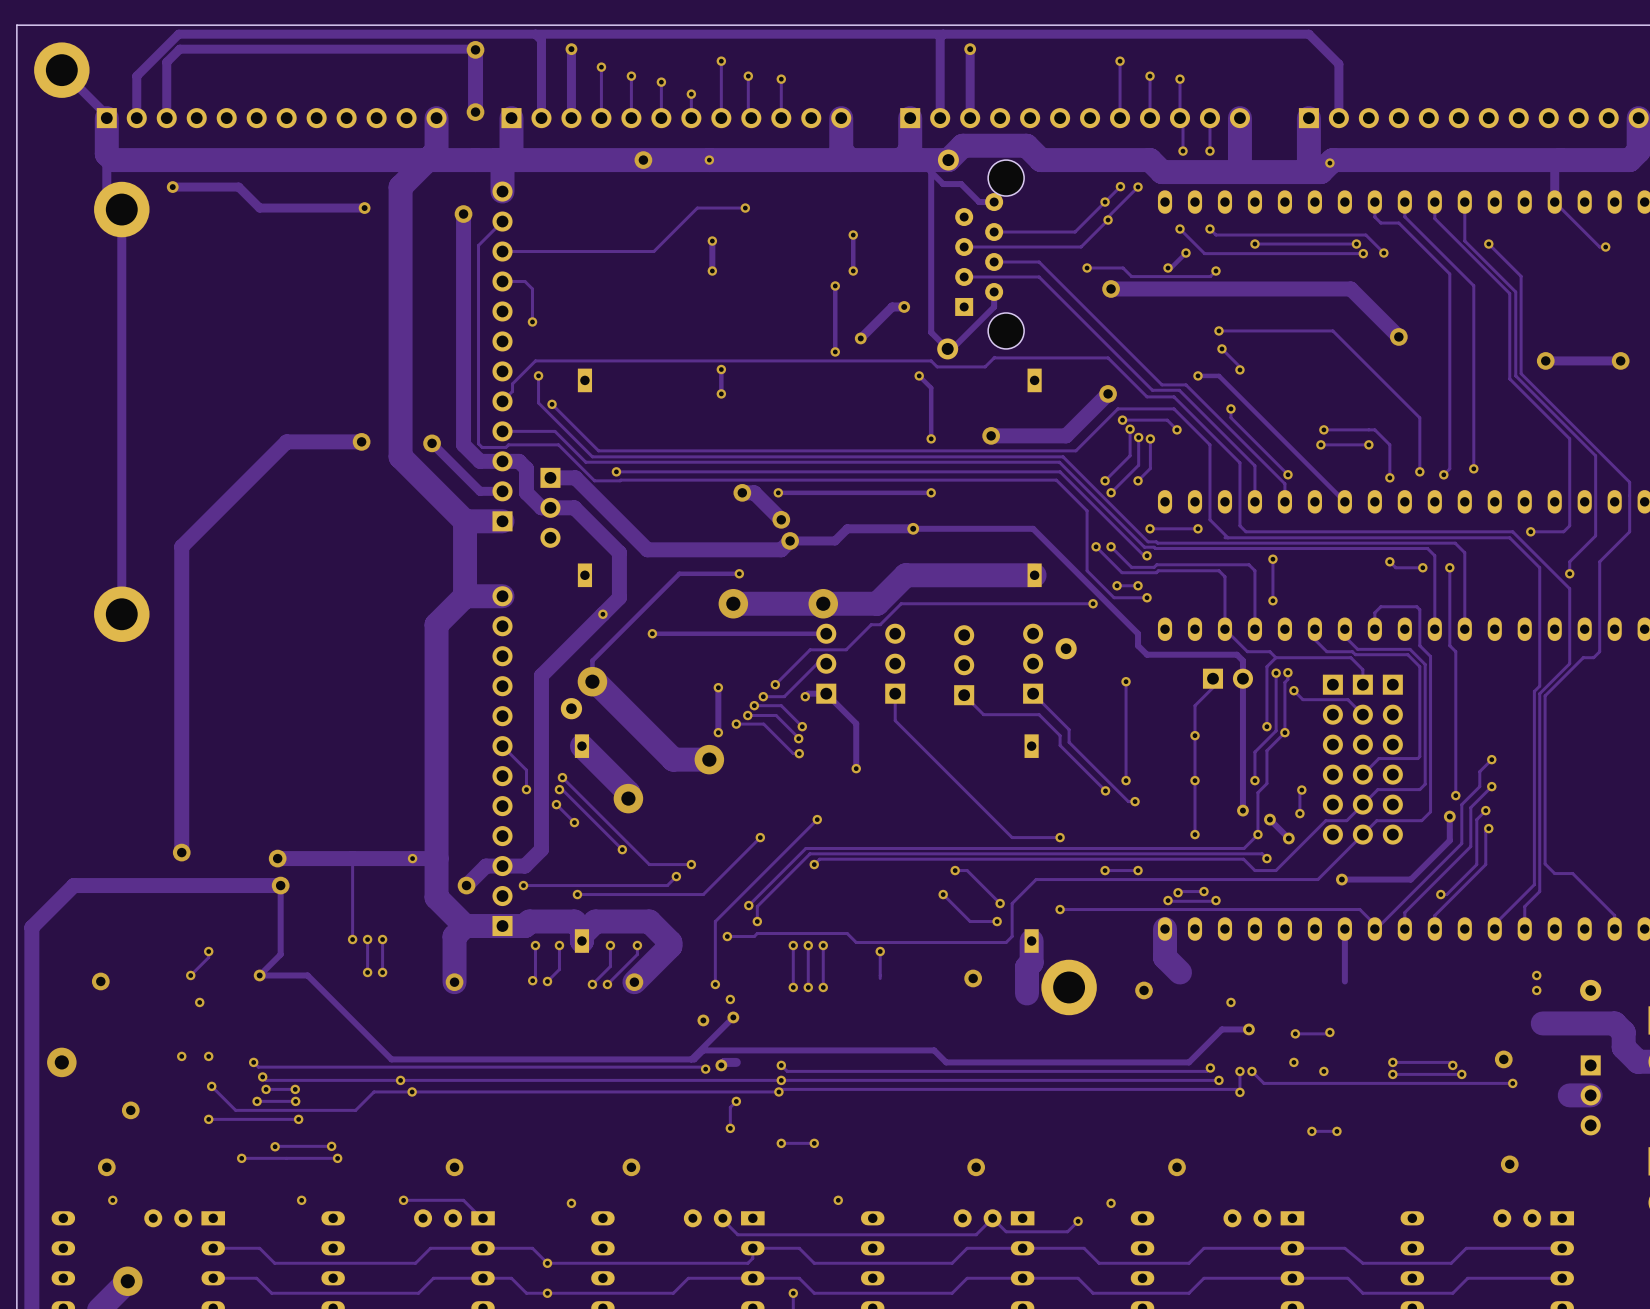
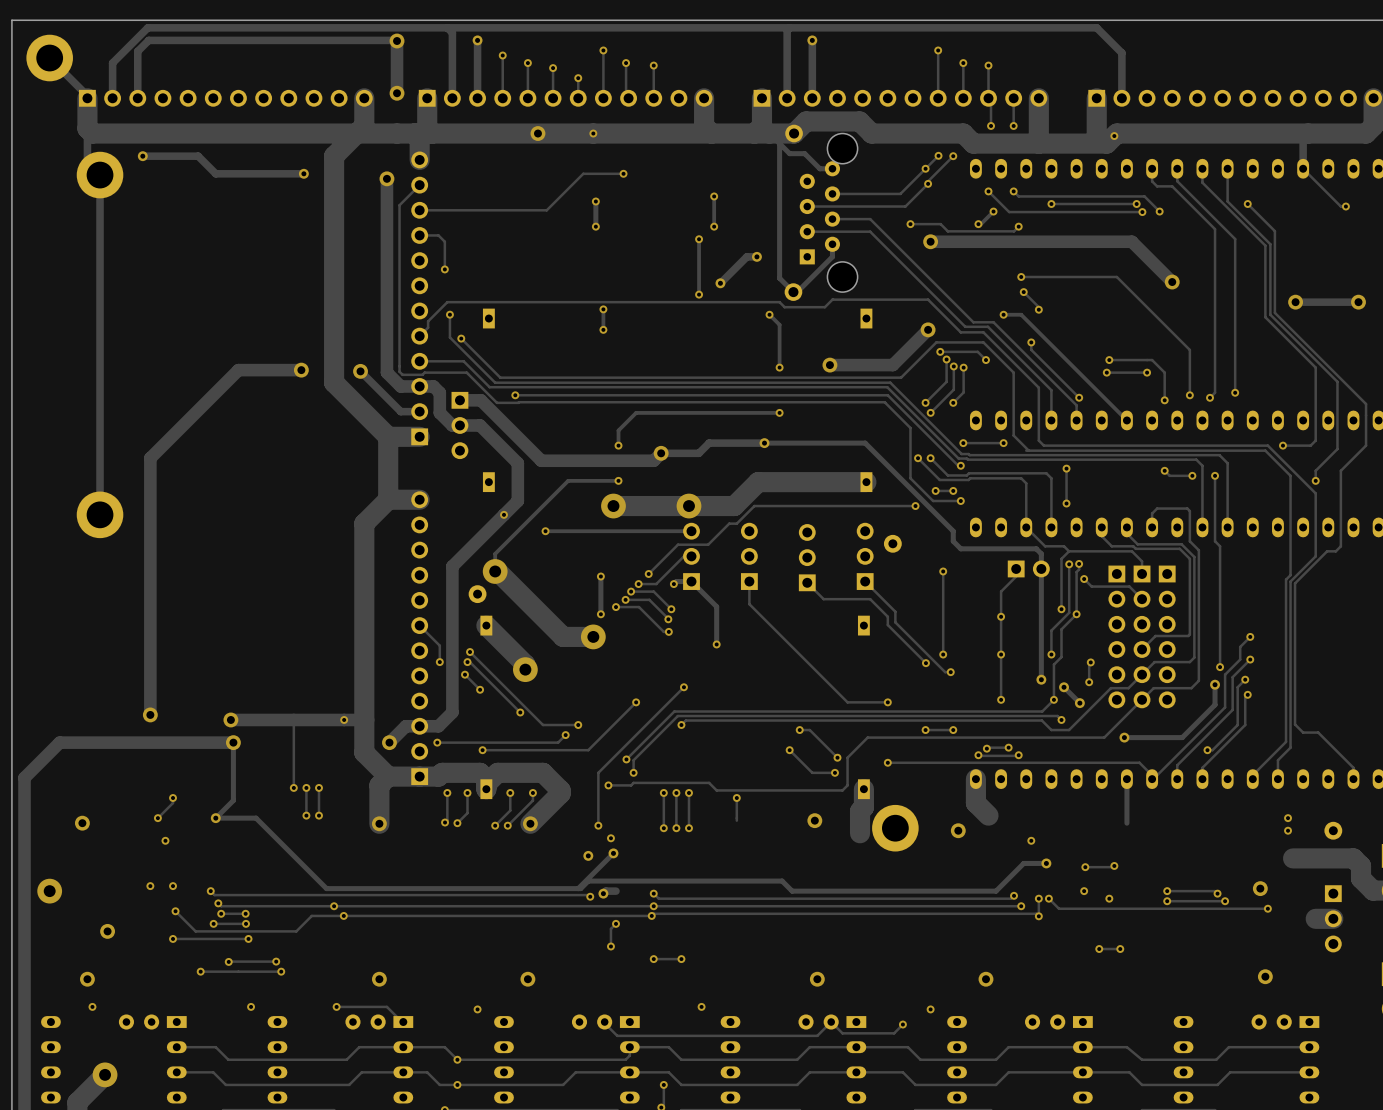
track: (742, 492) (754, 492) (781, 519) -> none
via: (742, 492) -> none
track: none -> (651, 412) (636, 412) (618, 430) (618, 445)
via position: (778, 492) -> (618, 445)
via: (781, 519) -> none

